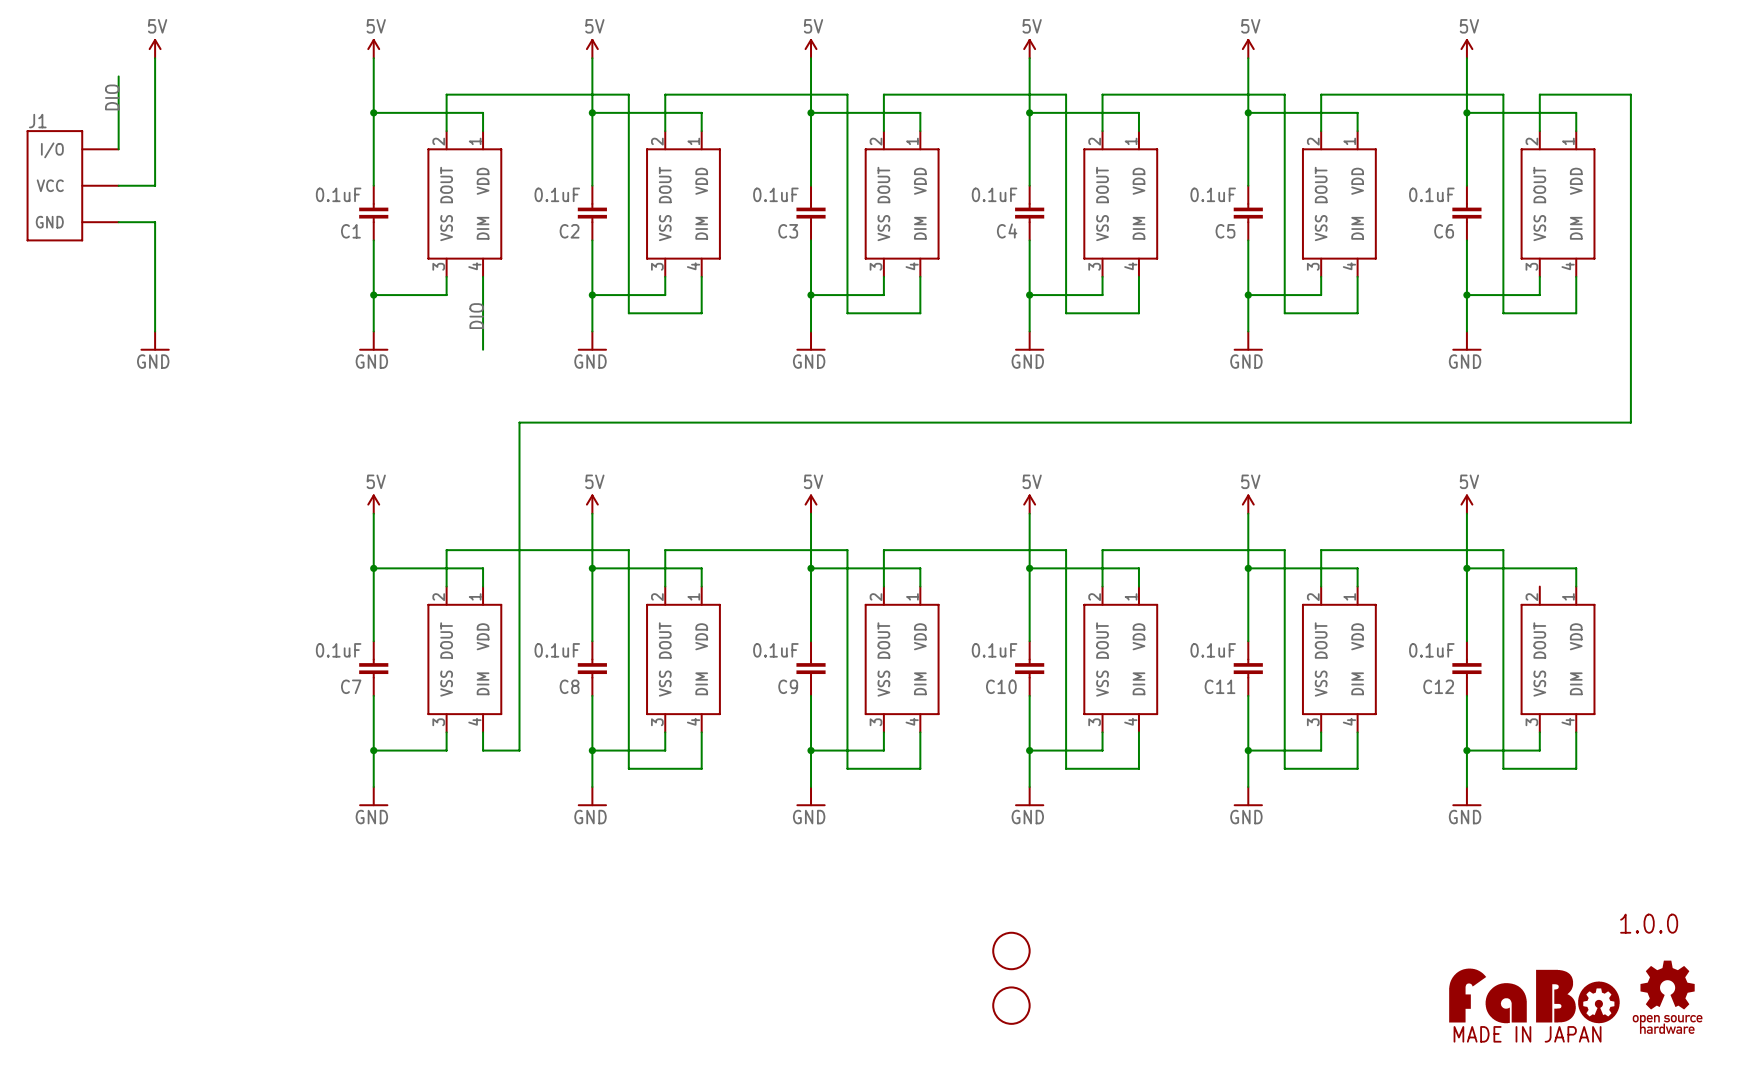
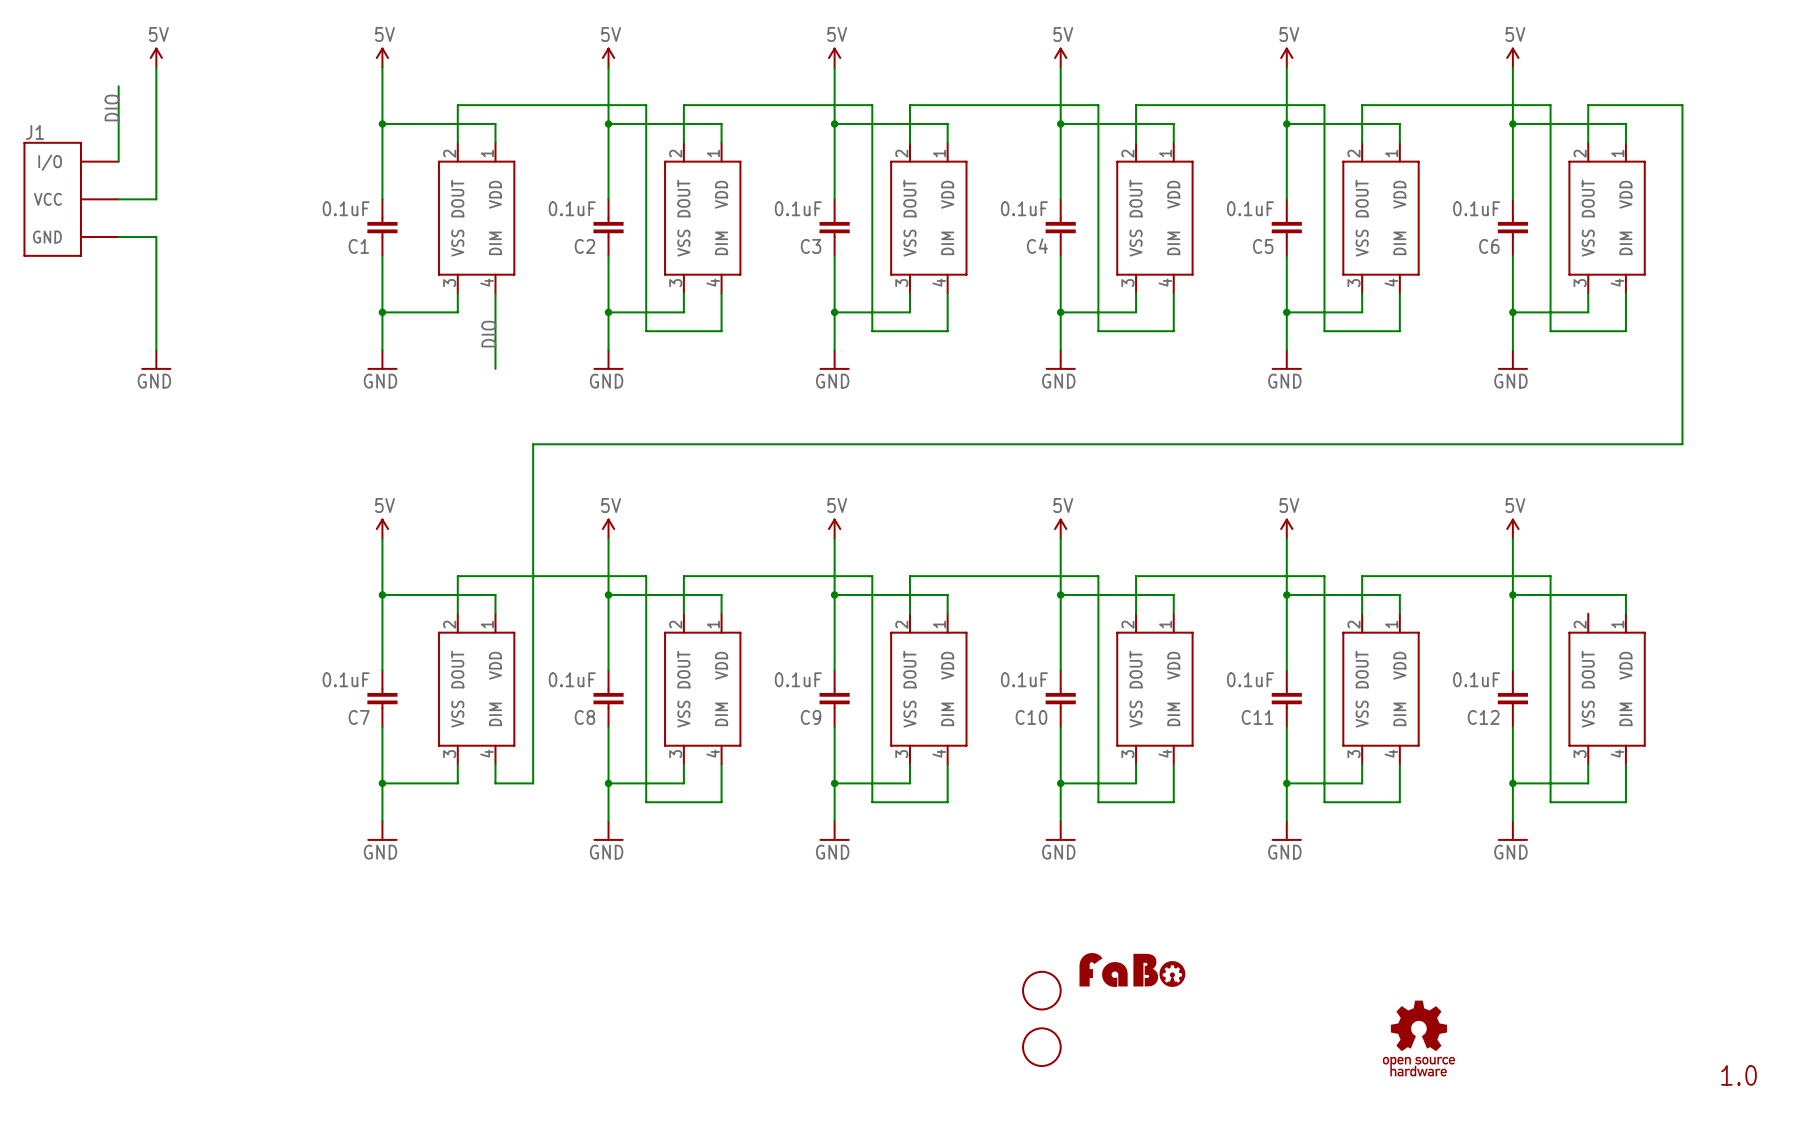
text: 1.0.0 (1649, 923) -> none
part: none -> (1132, 969)
part: (1534, 995) -> none
part: none -> (1418, 1038)
part: (1667, 997) -> none
text: none -> 1.0 (1738, 1075)

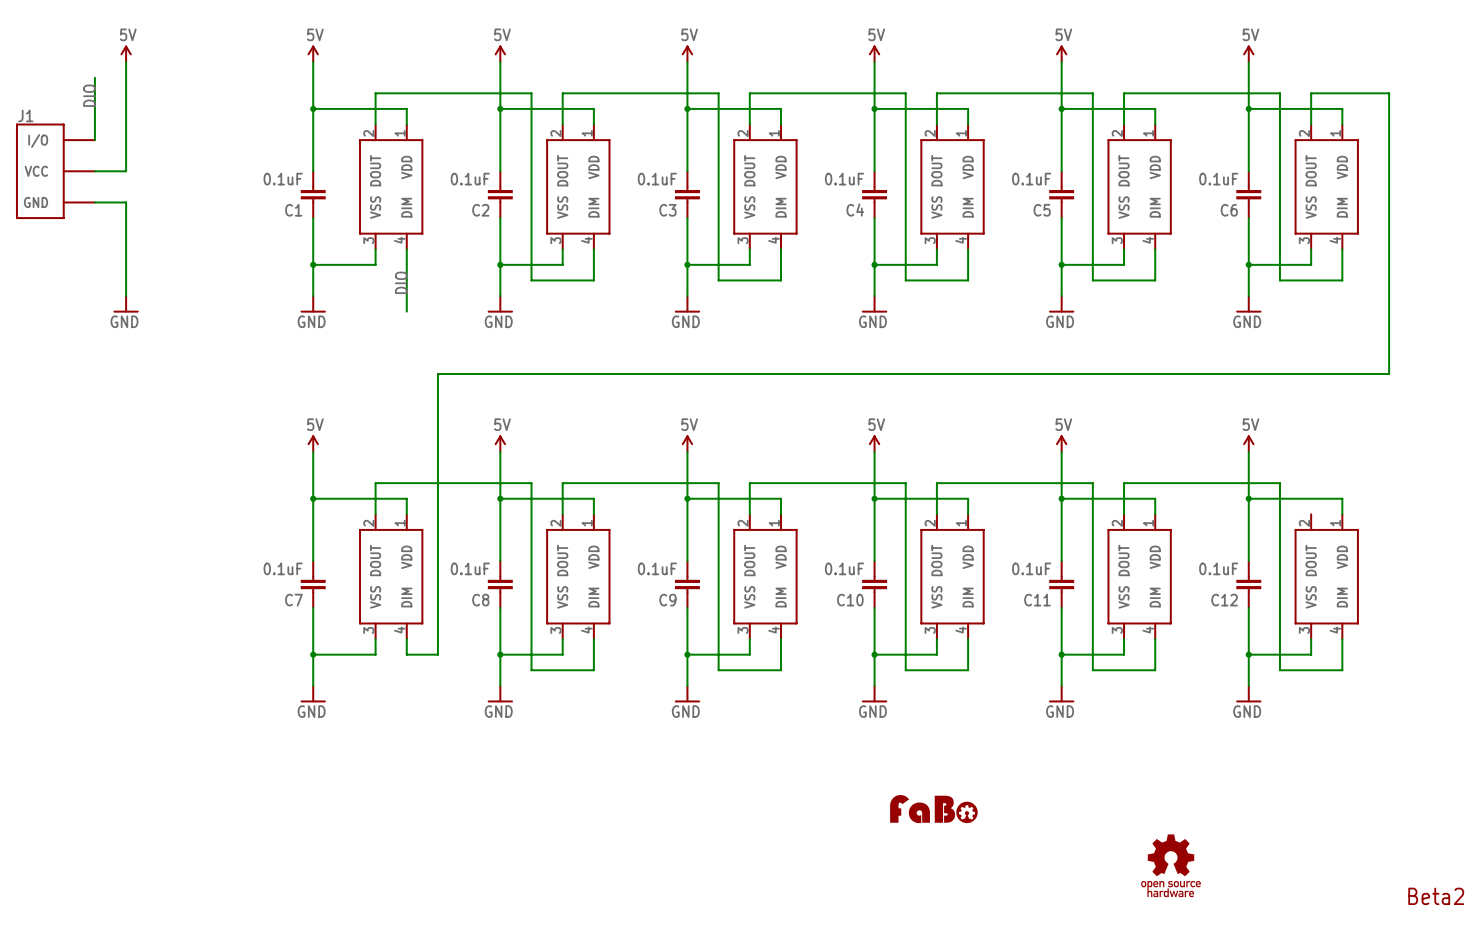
part: (1041, 990) -> none
part: (1041, 1047) -> none
text: 1.0 (1738, 1075) -> Beta2 (1436, 896)

